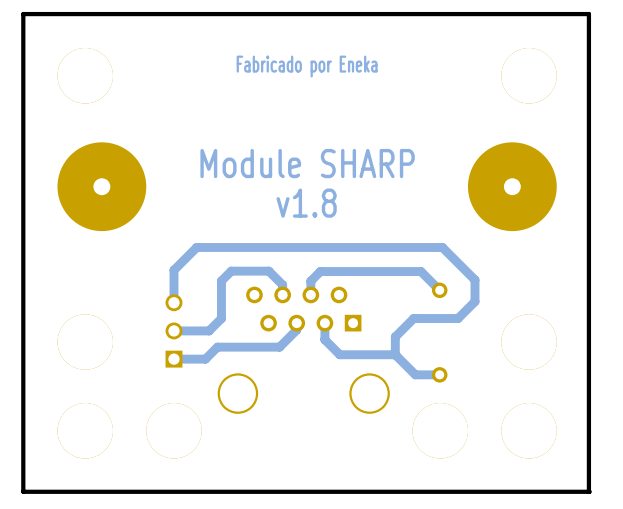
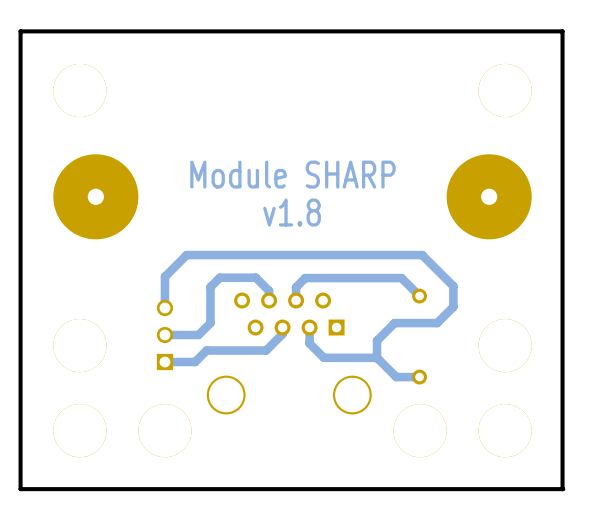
text: Fabricado por Eneka (307, 66) -> none

